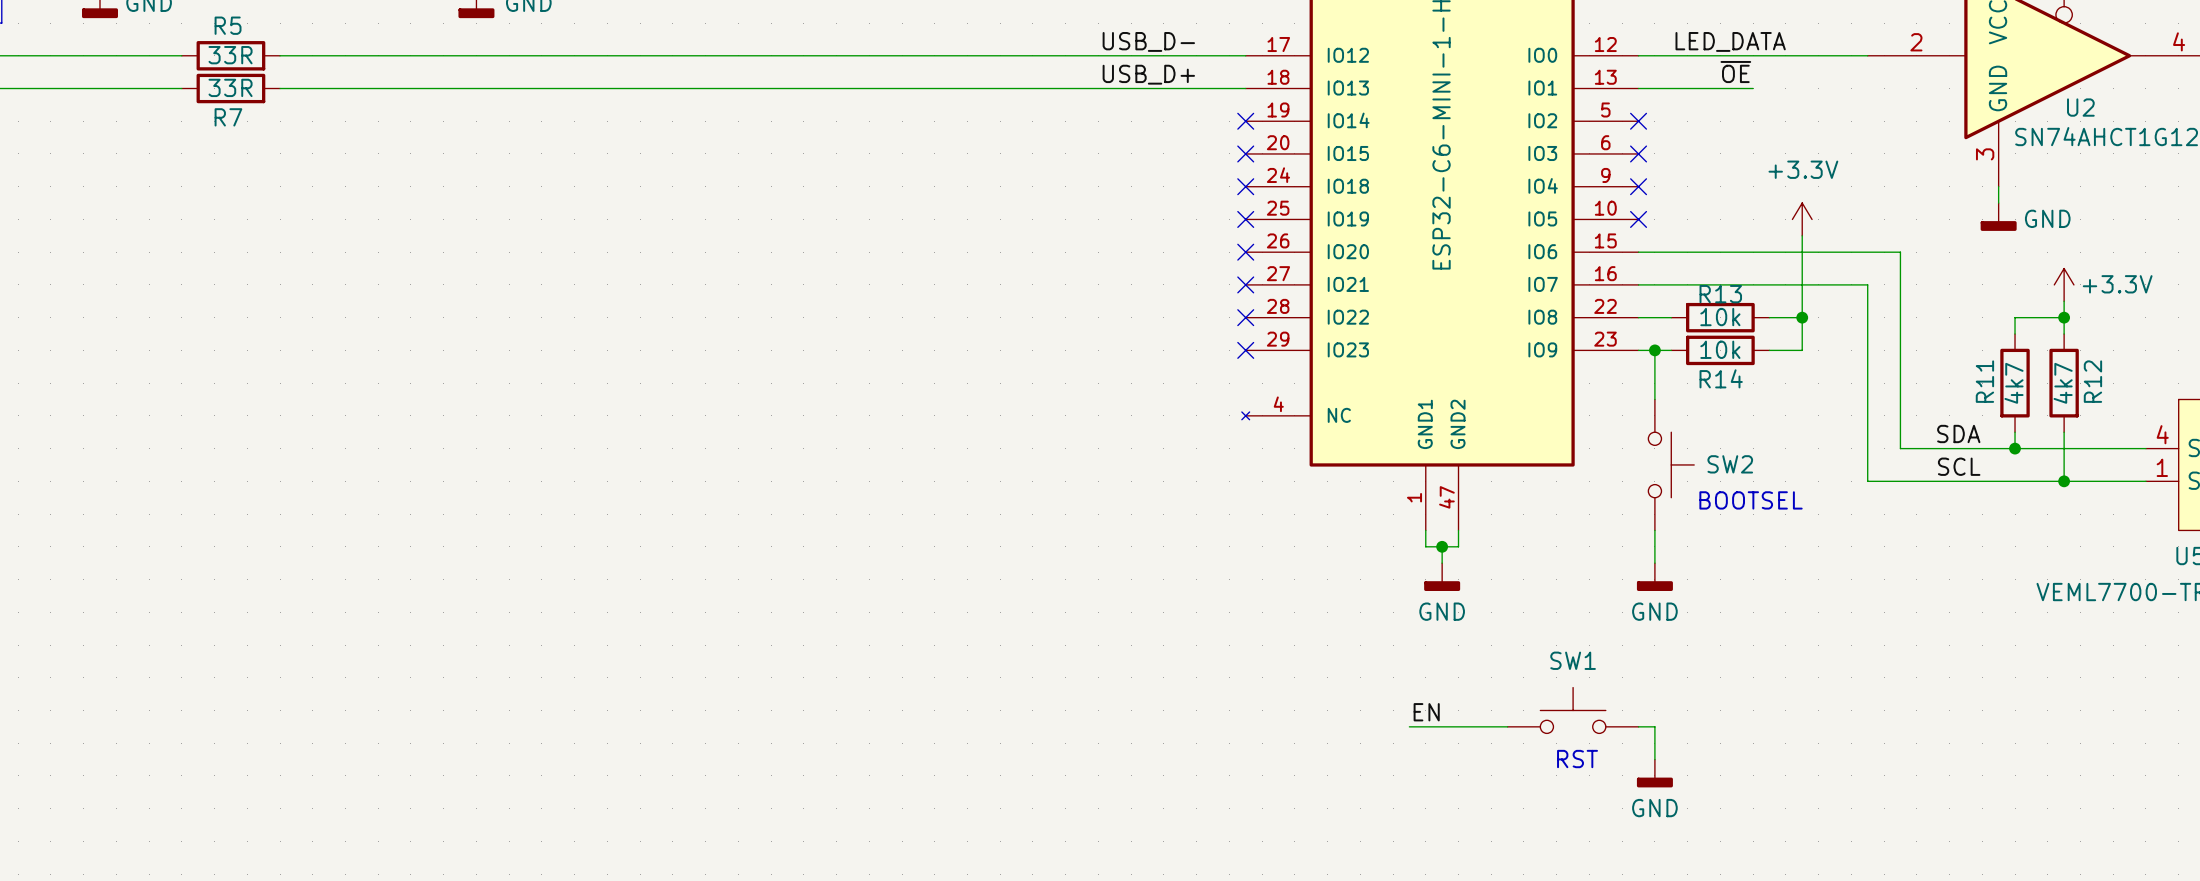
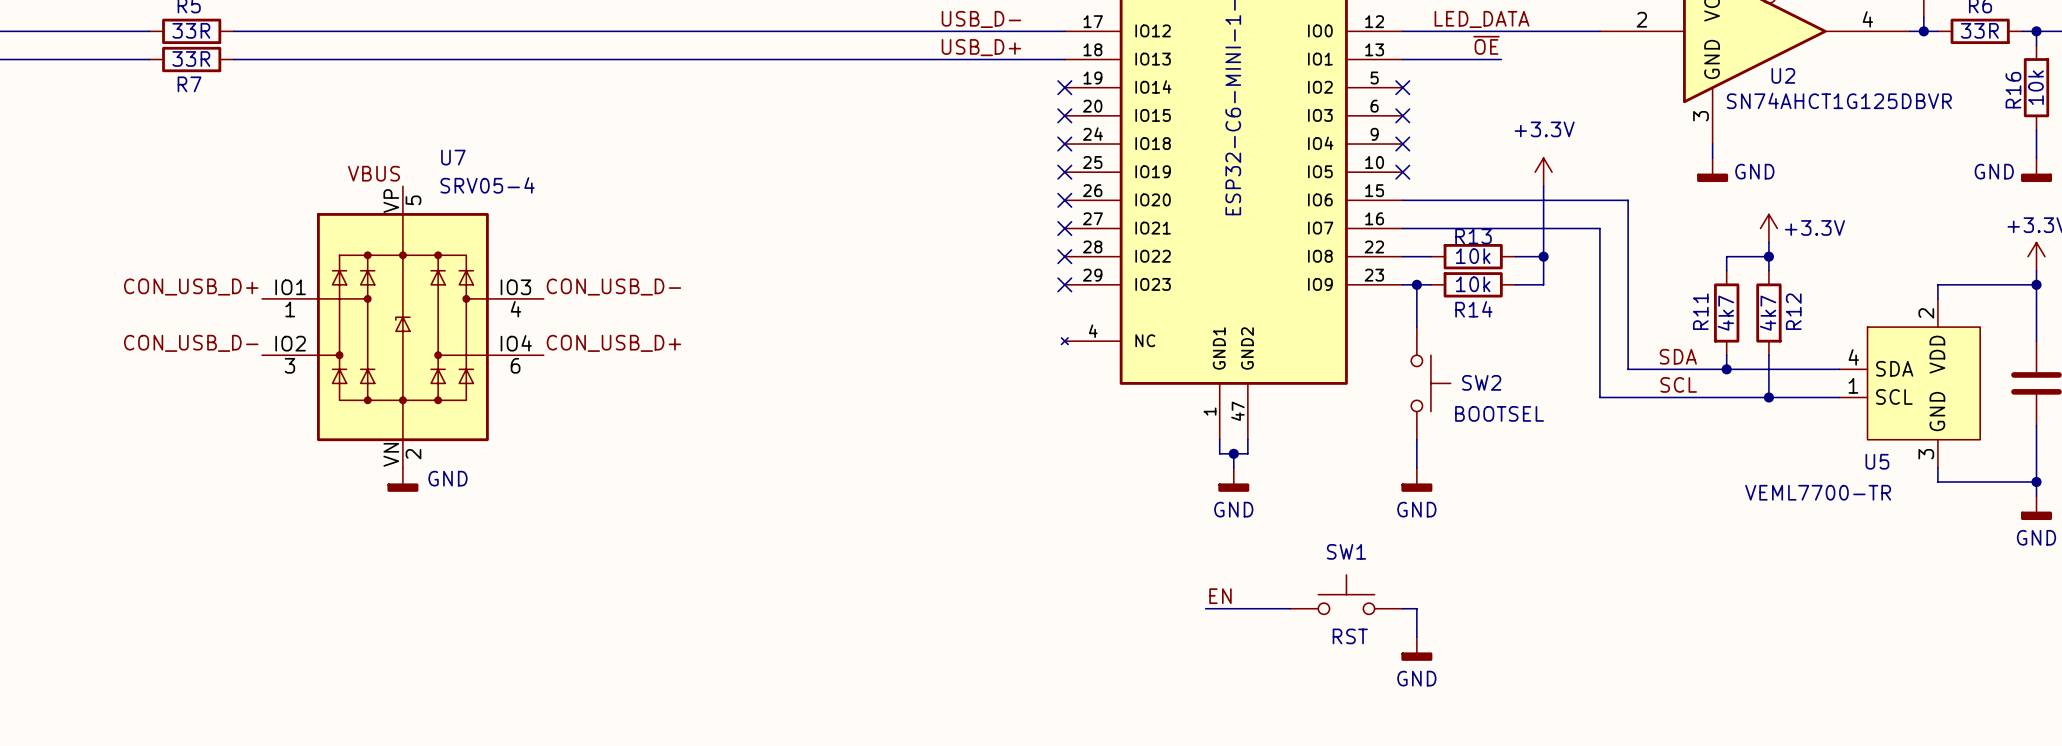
label: none -> VBUS (373, 173)
label: none -> CON_USB_D+ (191, 287)
label: none -> CON_USB_D- (613, 287)
U7: none -> SRV05-4 (402, 327)
label: none -> CON_USB_D- (191, 343)
label: none -> CON_USB_D+ (613, 343)
power symbol: none -> GND (402, 479)

